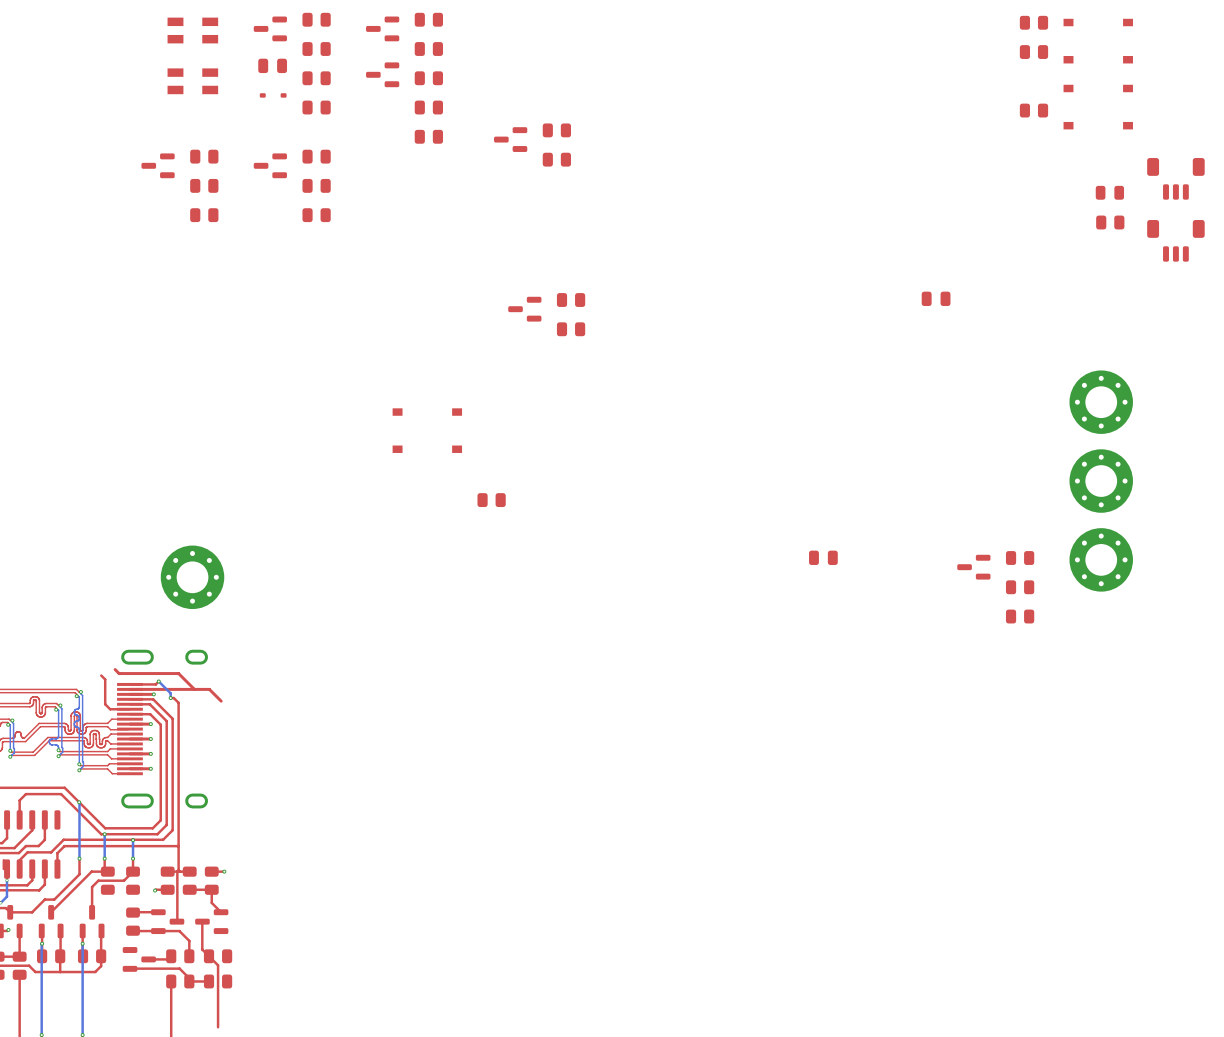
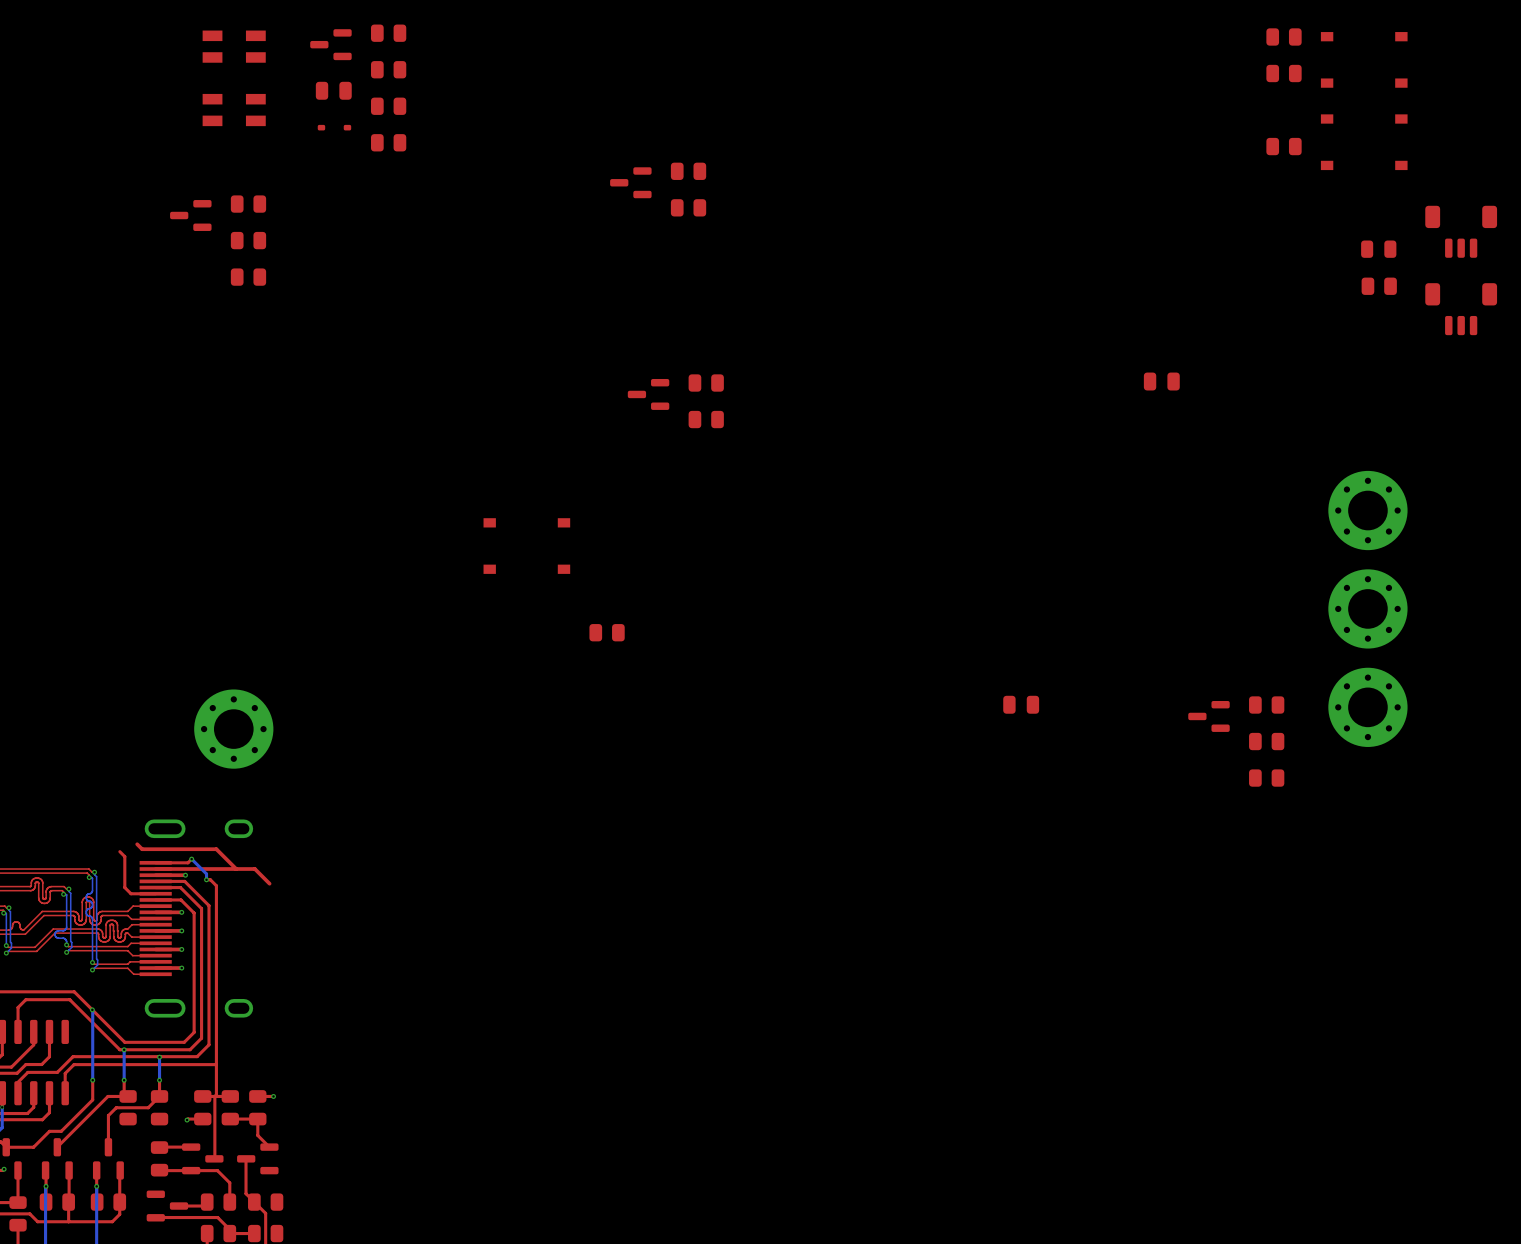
part: (428, 19) -> none
part: (382, 28) -> none
part: (428, 49) -> none
part: (382, 74) -> none
part: (428, 78) -> none
part: (428, 107) -> none
part: (428, 136) -> none
part: (316, 156) -> none
part: (270, 165) -> none
part: (316, 185) -> none
part: (316, 215) -> none

